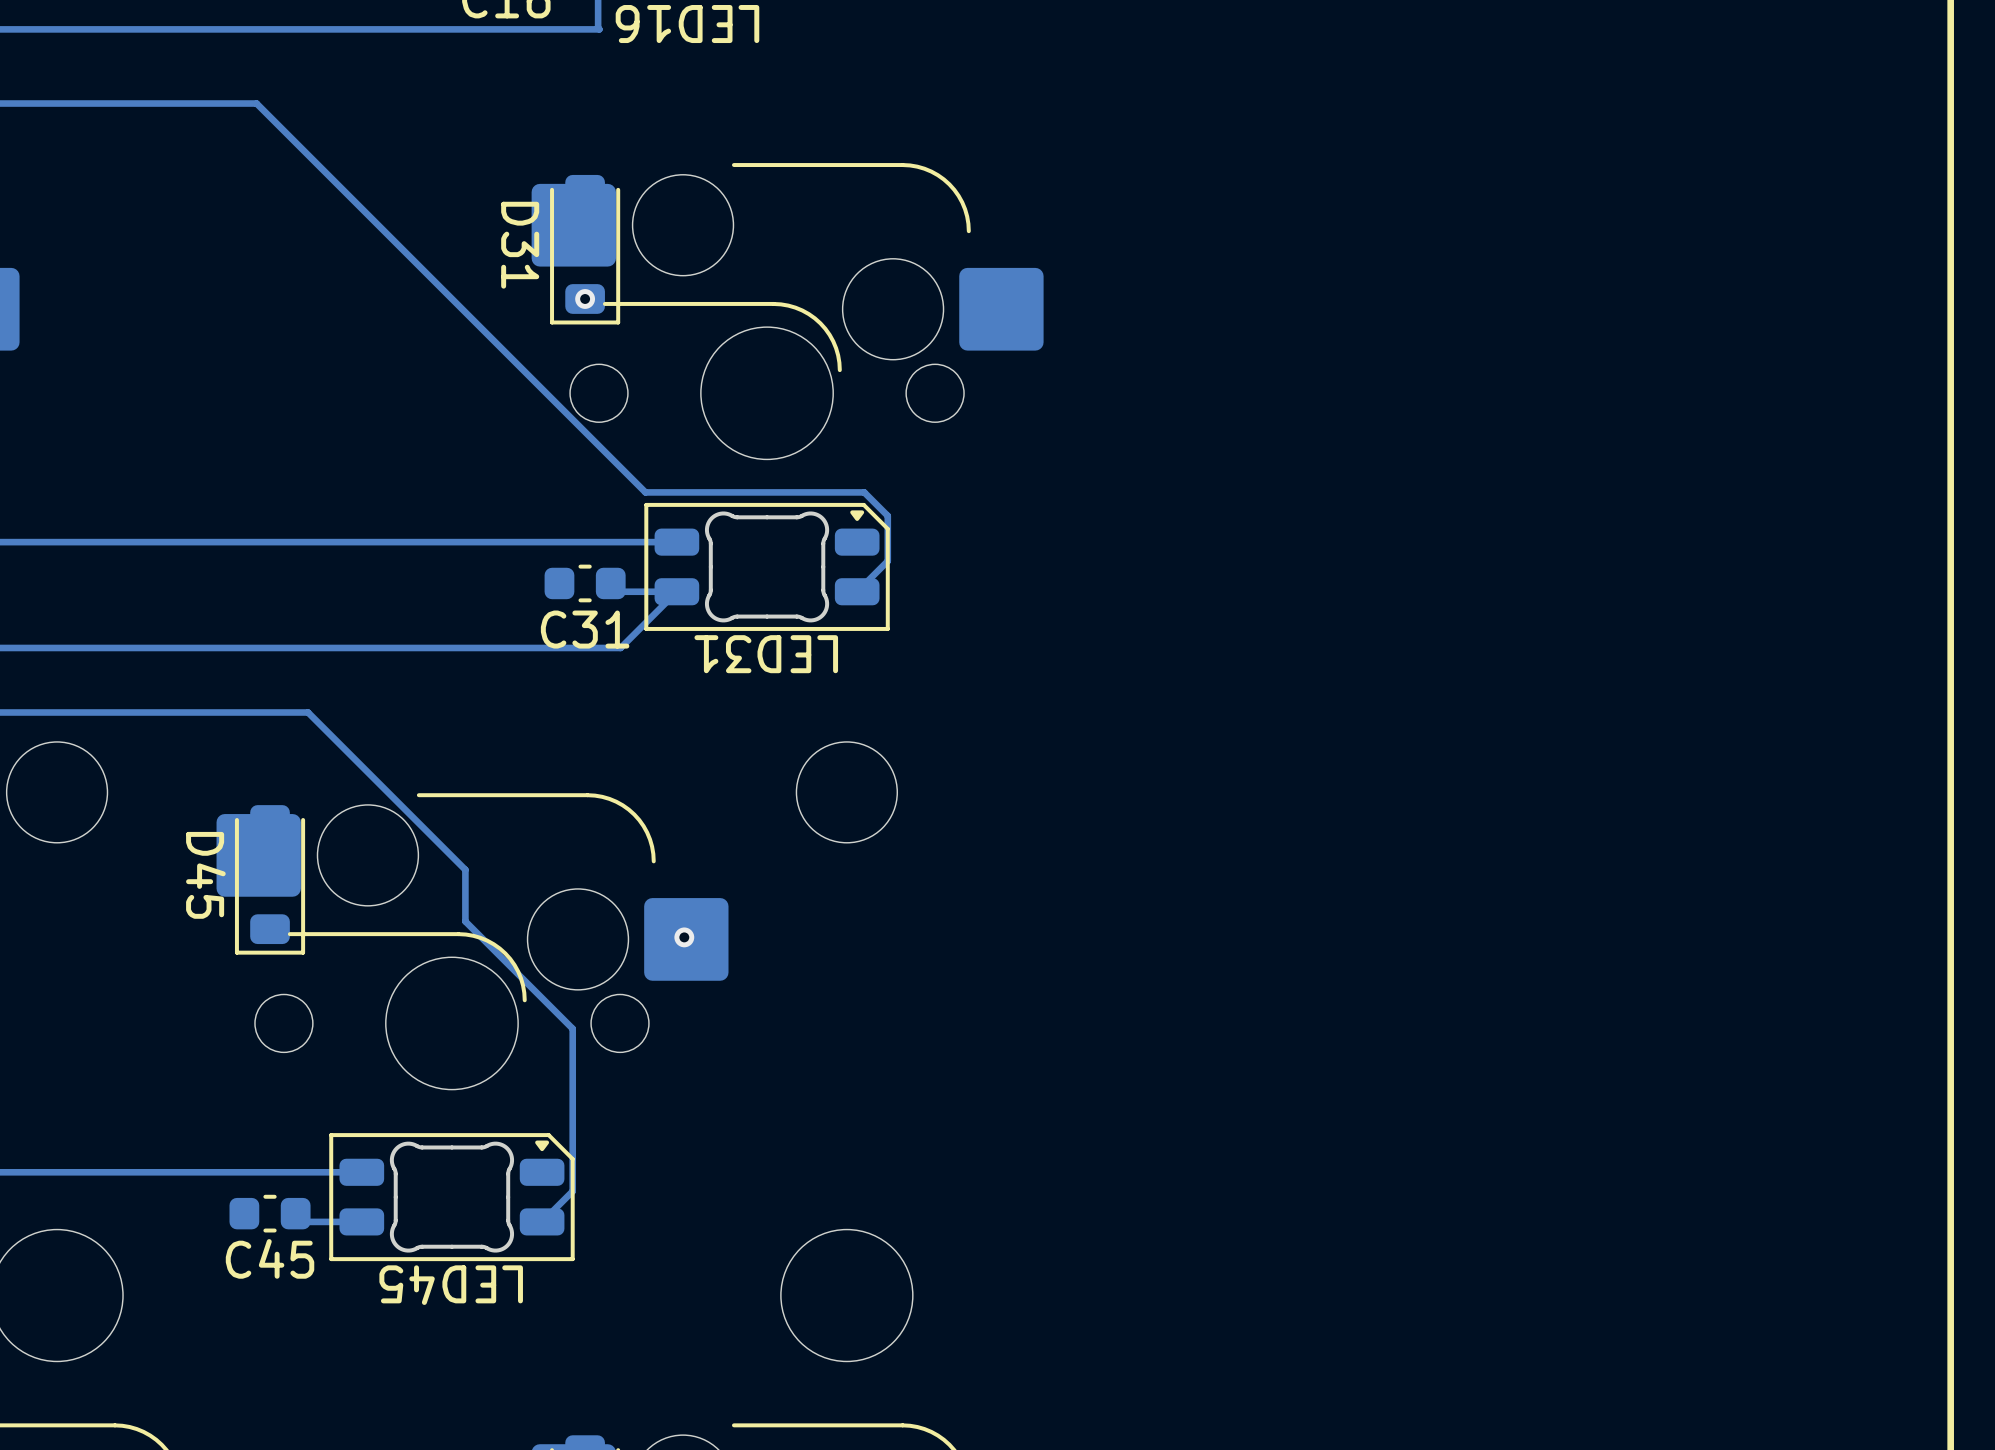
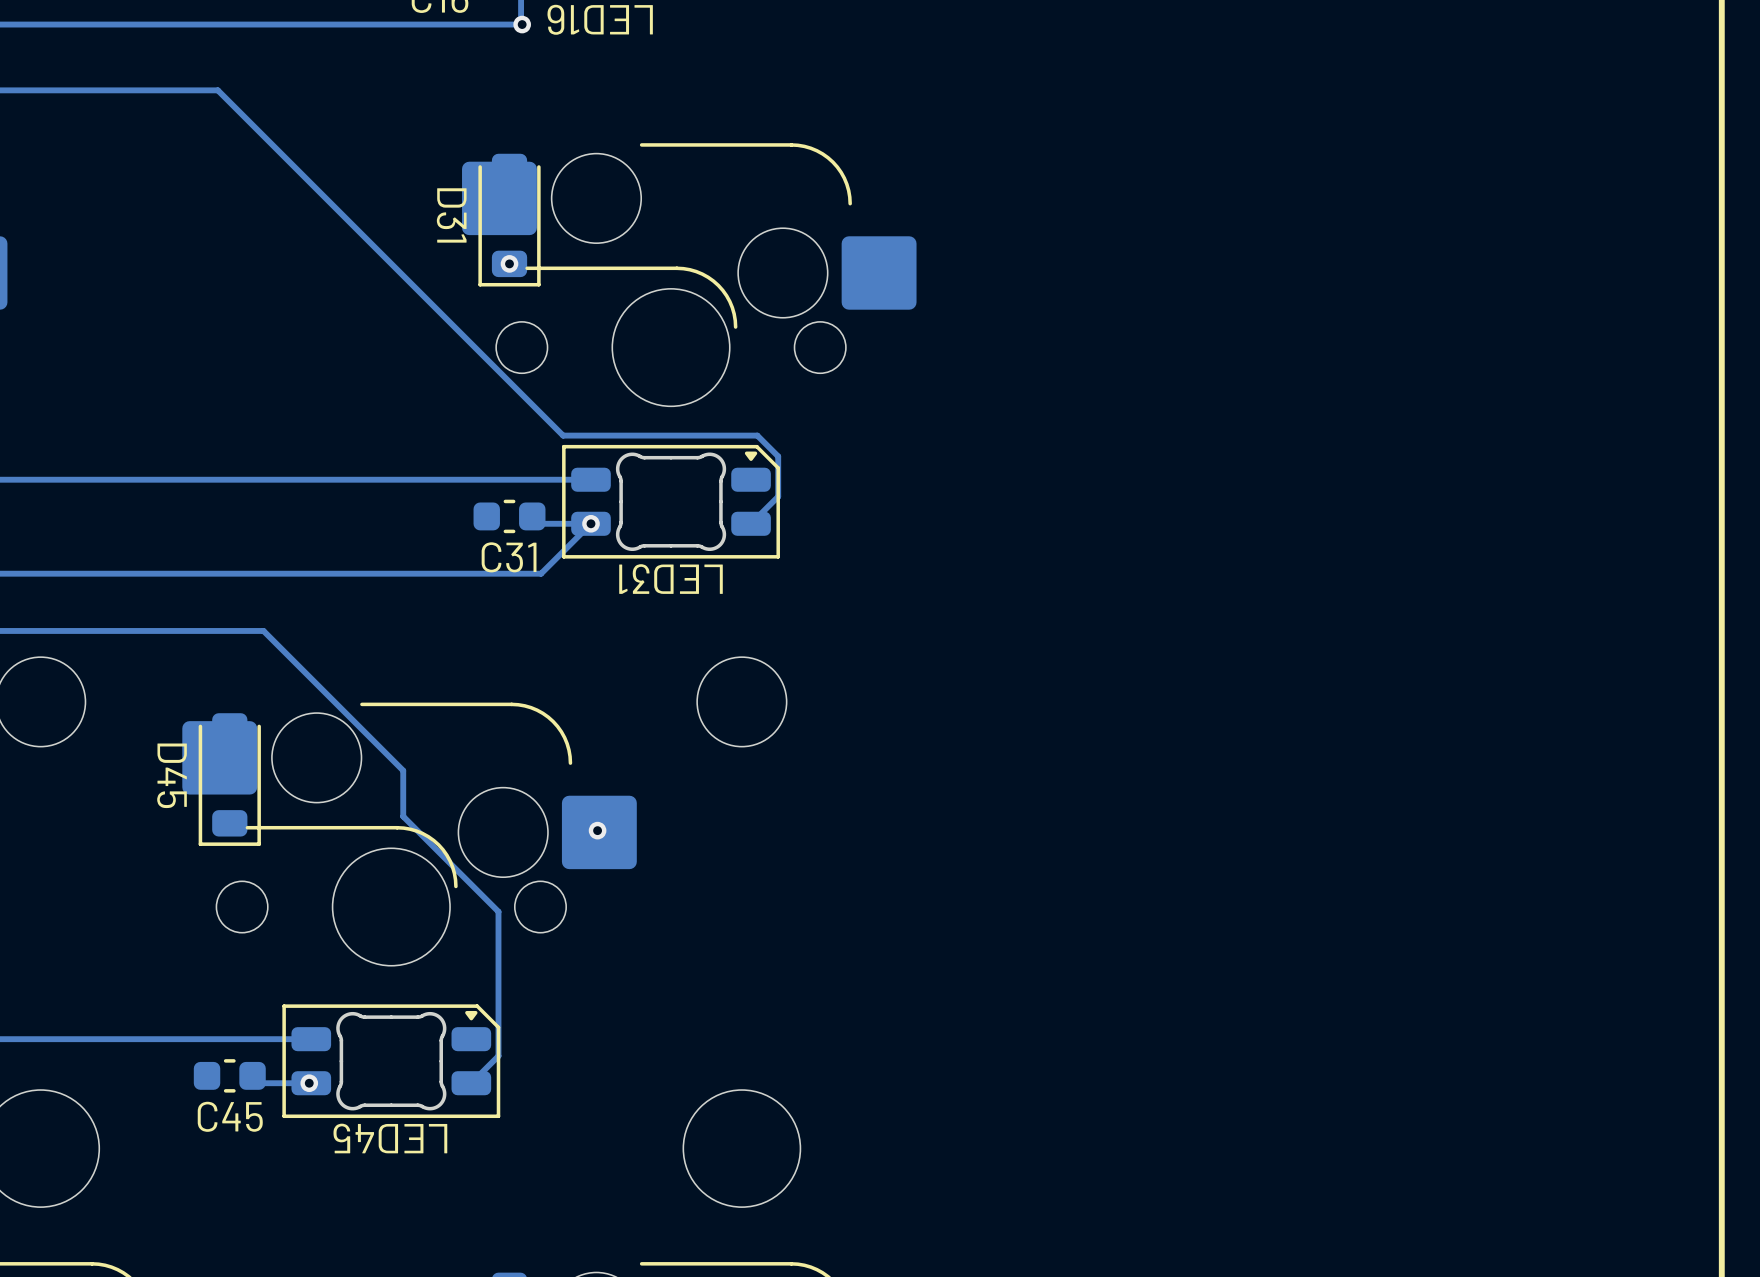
via: none -> (522, 24)
via: none -> (591, 523)
via: none -> (309, 1083)

